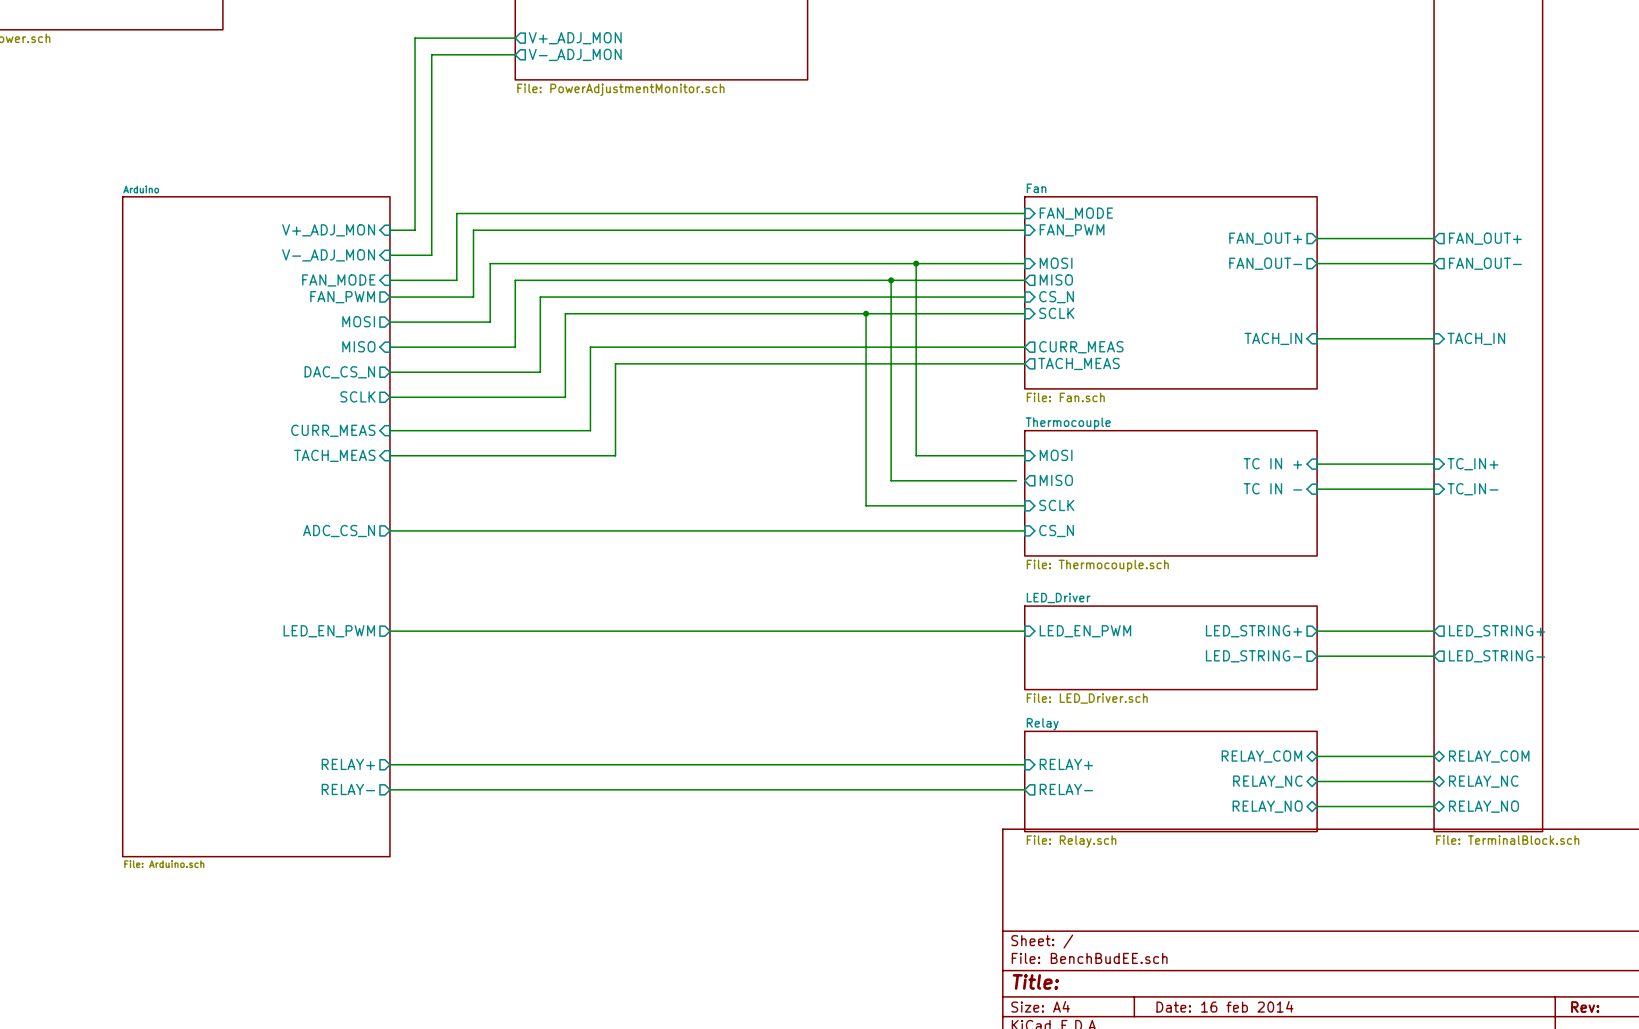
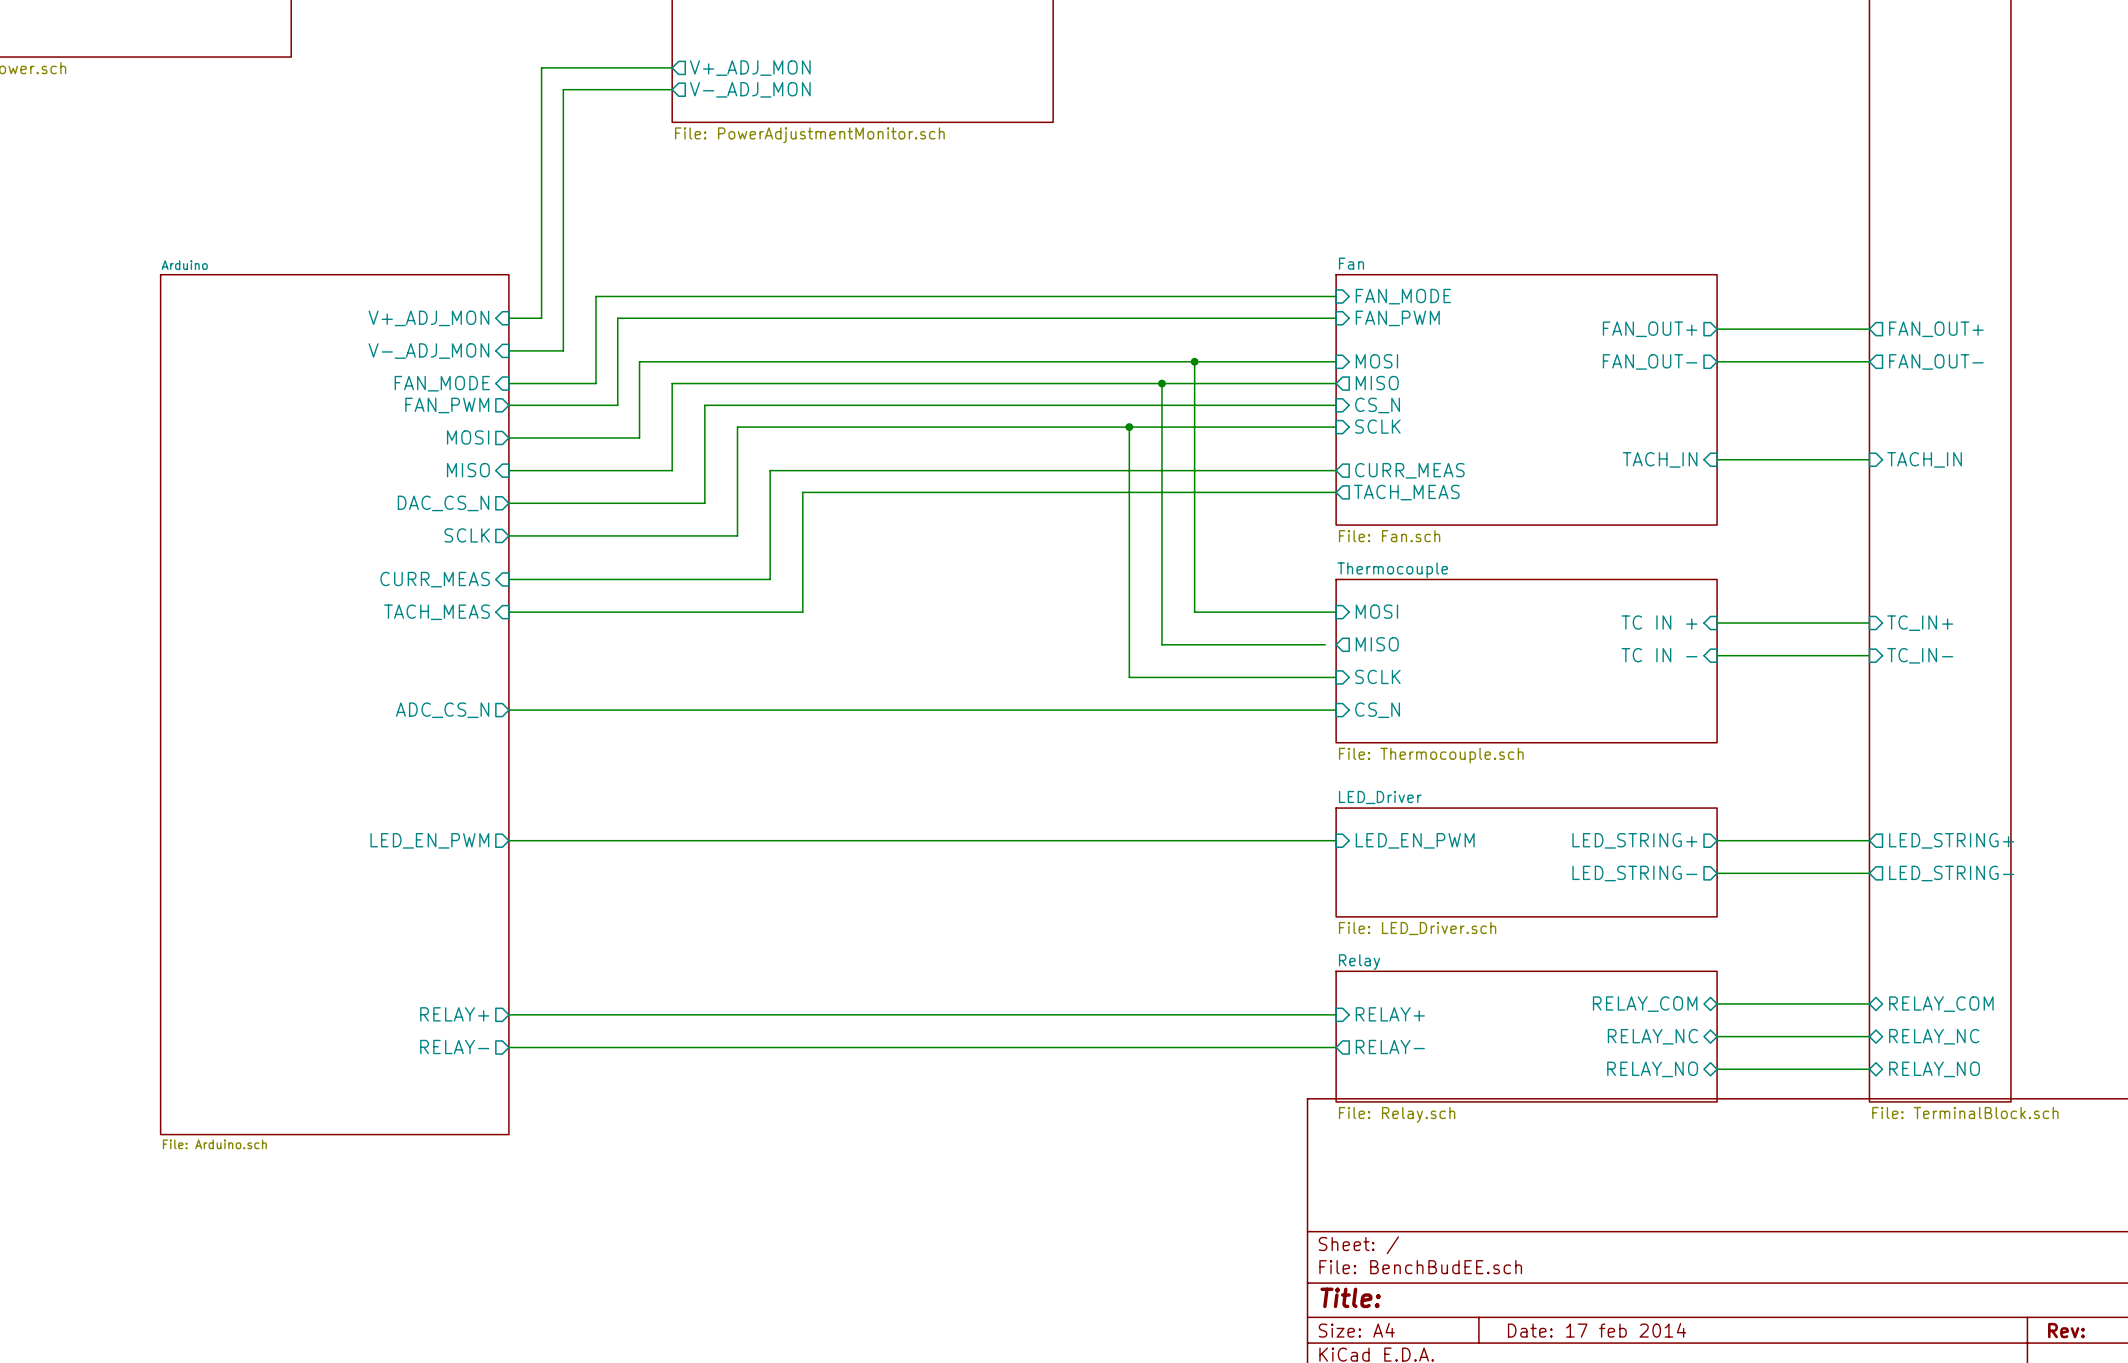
title block: Date: 16 feb 2014 (1224, 1006) -> Date: 17 feb 2014 (1597, 1330)

